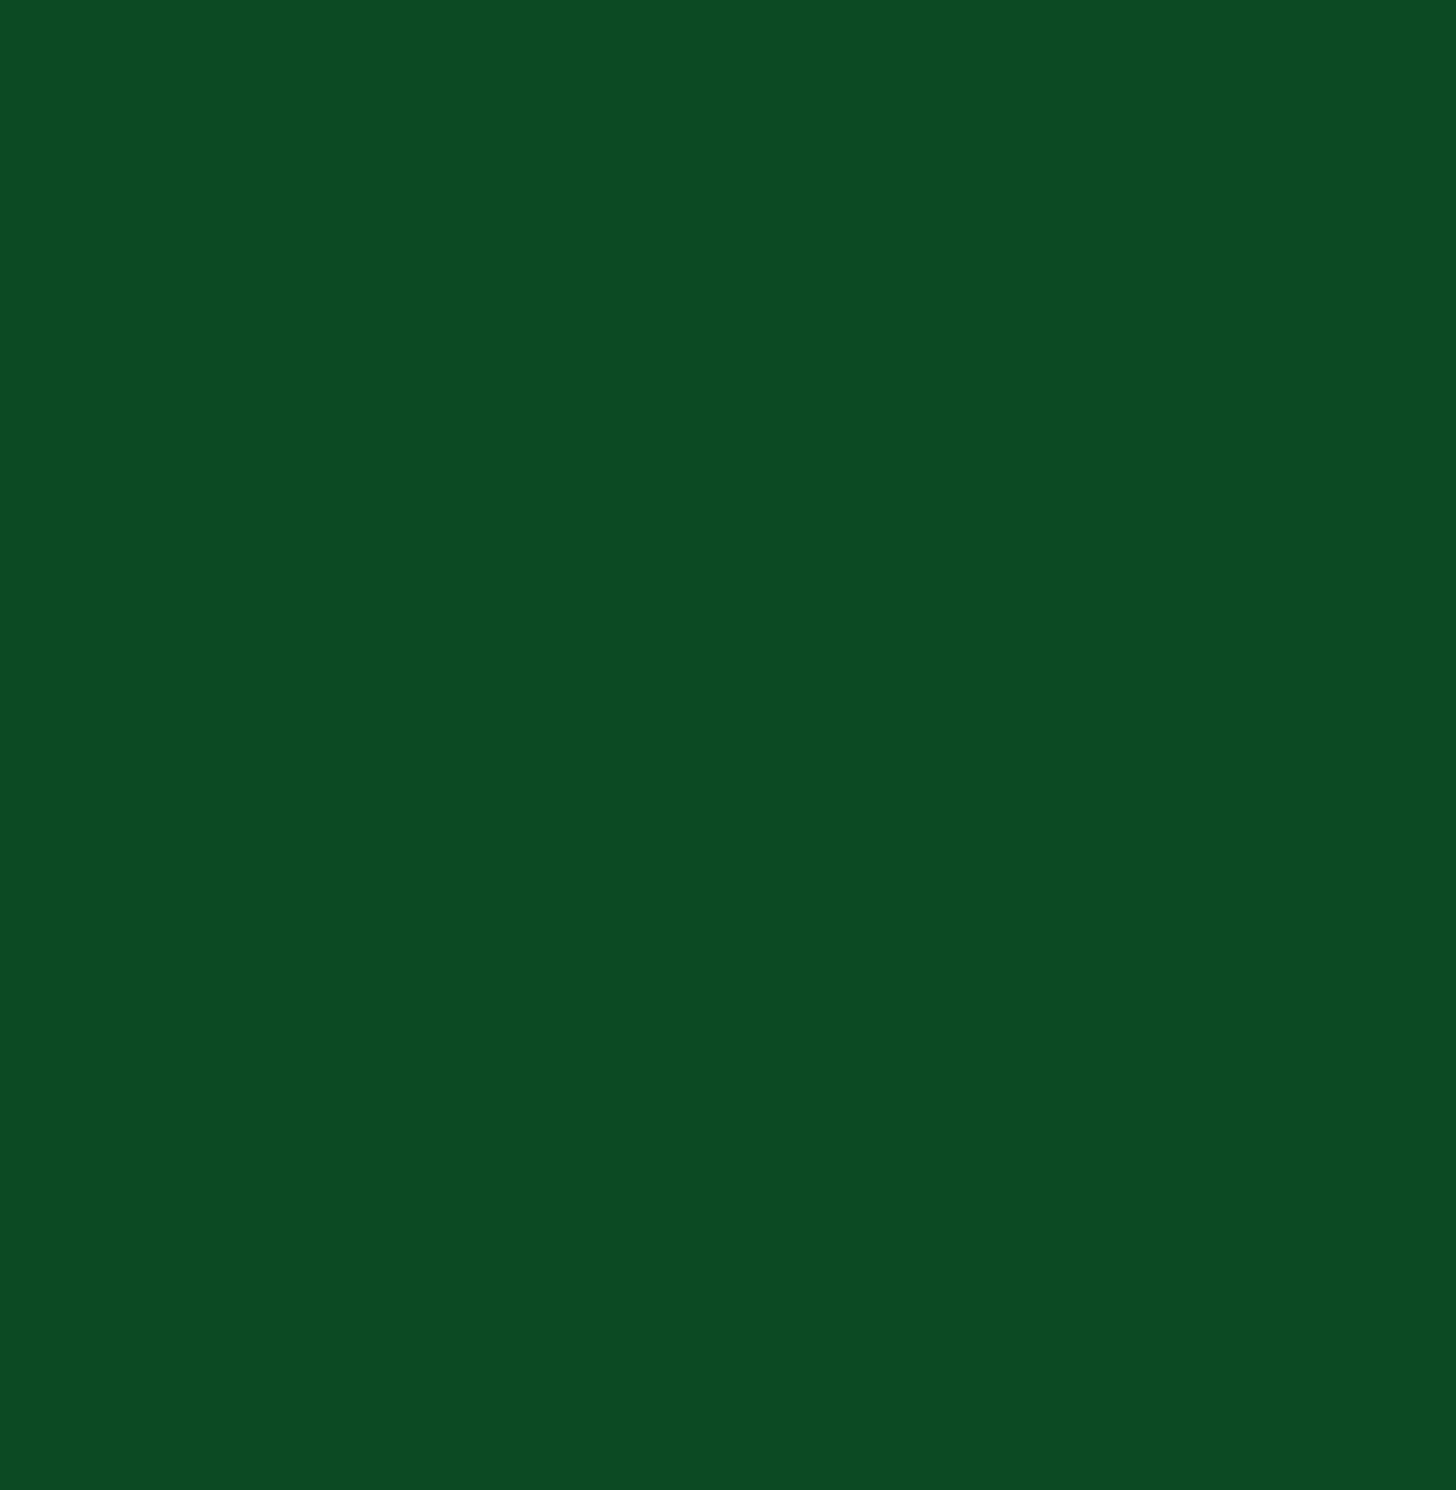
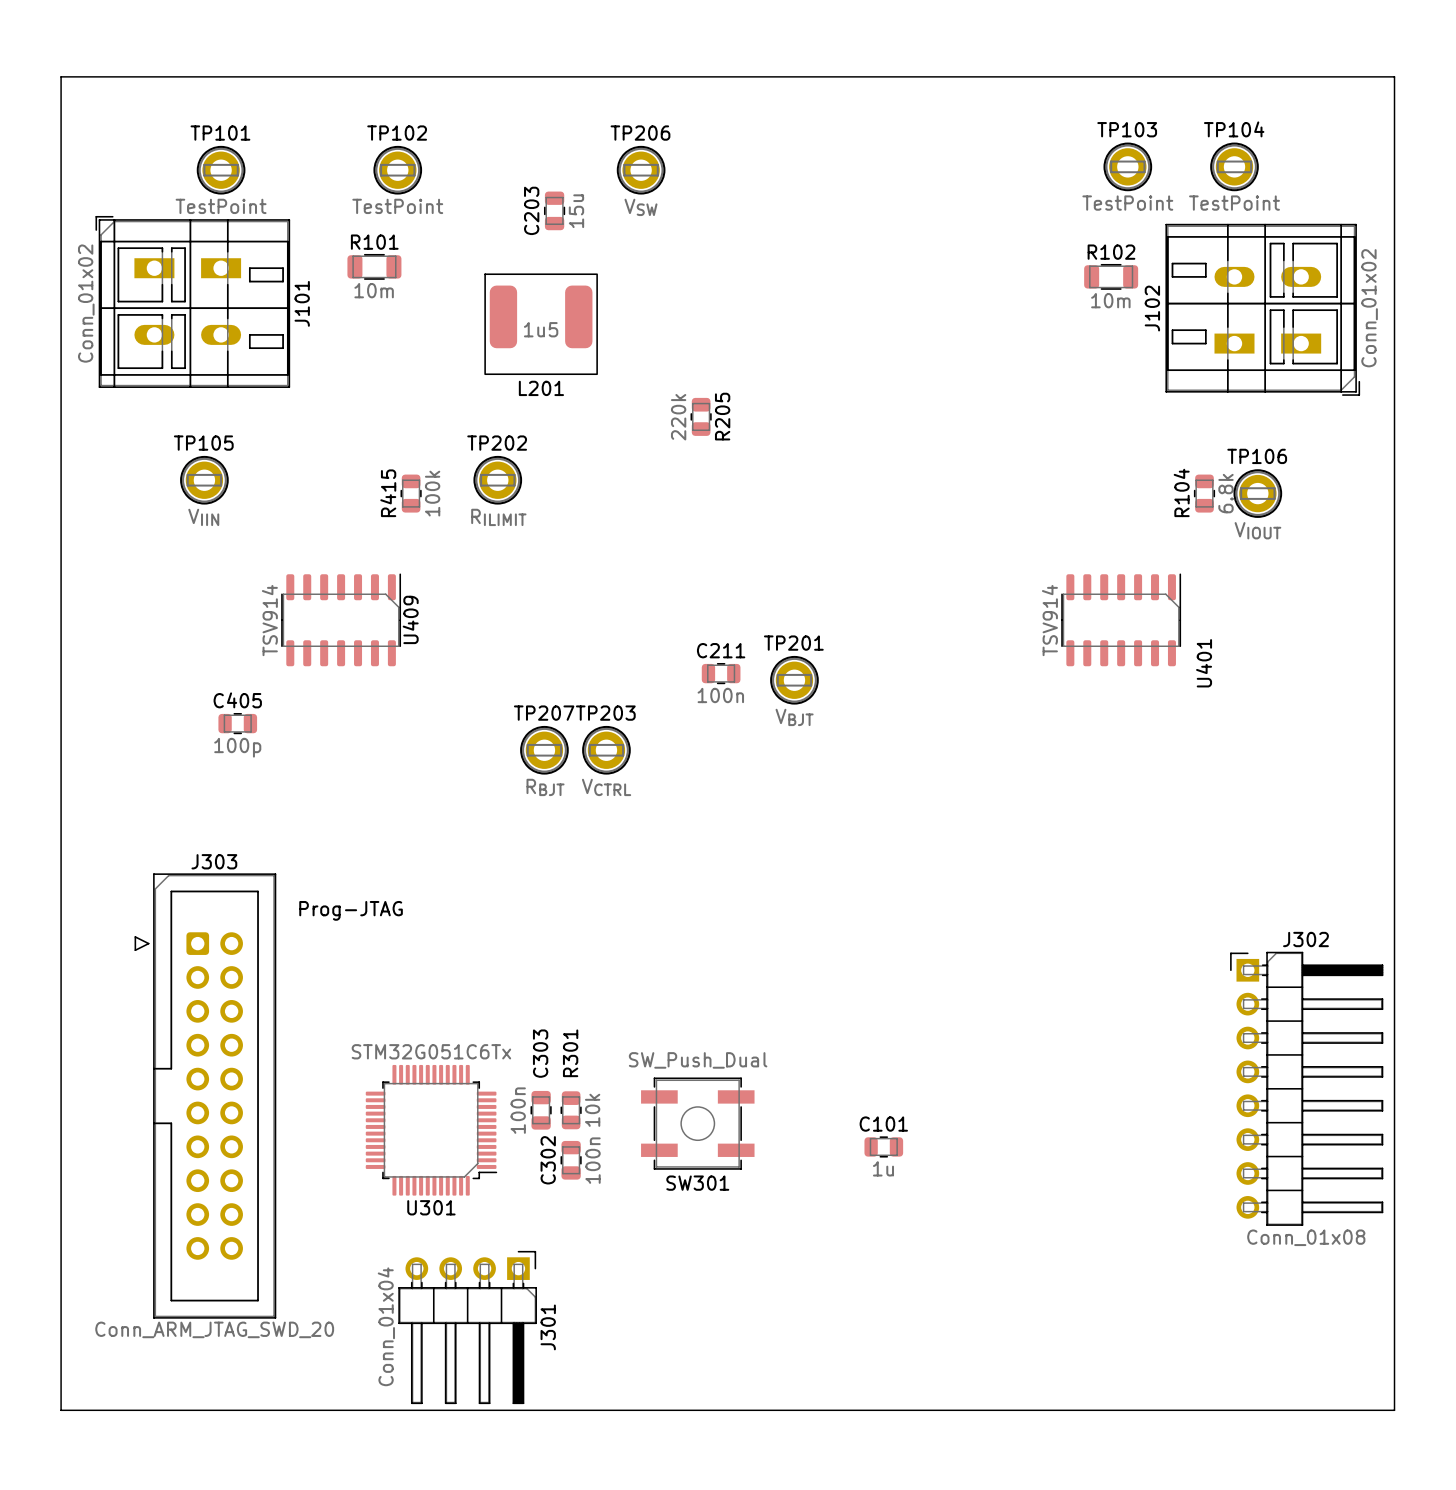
board edge: none -> (61, 76) (1394, 76) (1394, 1410) (61, 1410) (61, 76)
TP103: none -> TestPoint (1127, 166)
TP104: none -> TestPoint (1234, 166)
TP101: none -> TestPoint (221, 170)
TP102: none -> TestPoint (397, 170)
TP206: none -> VSW (641, 170)
C203: none -> 15u (554, 210)
R101: none -> 10m (374, 266)
R102: none -> 10m (1111, 276)
J101: none -> Conn_01x02 (192, 301)
J102: none -> Conn_01x02 (1262, 309)
L201: none -> 1u5 (541, 324)
R205: none -> 220k (701, 416)
TP105: none -> VIIN (204, 480)
TP202: none -> RILIMIT (497, 480)
R415: none -> 100k (411, 493)
R104: none -> 6.8k (1204, 493)
TP106: none -> VIOUT (1257, 493)
U409: none -> TSV914 (341, 619)
U401: none -> TSV914 (1121, 619)
C211: none -> 100n (721, 673)
TP201: none -> VBJT (794, 680)
C405: none -> 100p (237, 723)
TP207: none -> RBJT (544, 750)
TP203: none -> VCTRL (606, 750)
text: none -> Prog-JTAG (351, 910)
J302: none -> Conn_01x08 (1306, 1088)
J303: none -> Conn_ARM_JTAG_SWD_20 (205, 1096)
C303: none -> 100n (541, 1110)
R301: none -> 10k (571, 1110)
SW301: none -> SW_Push_Dual (697, 1123)
U301: none -> STM32G051C6Tx (431, 1130)
C101: none -> 1u (883, 1146)
C302: none -> 100n (571, 1160)
J301: none -> Conn_01x04 (467, 1327)

